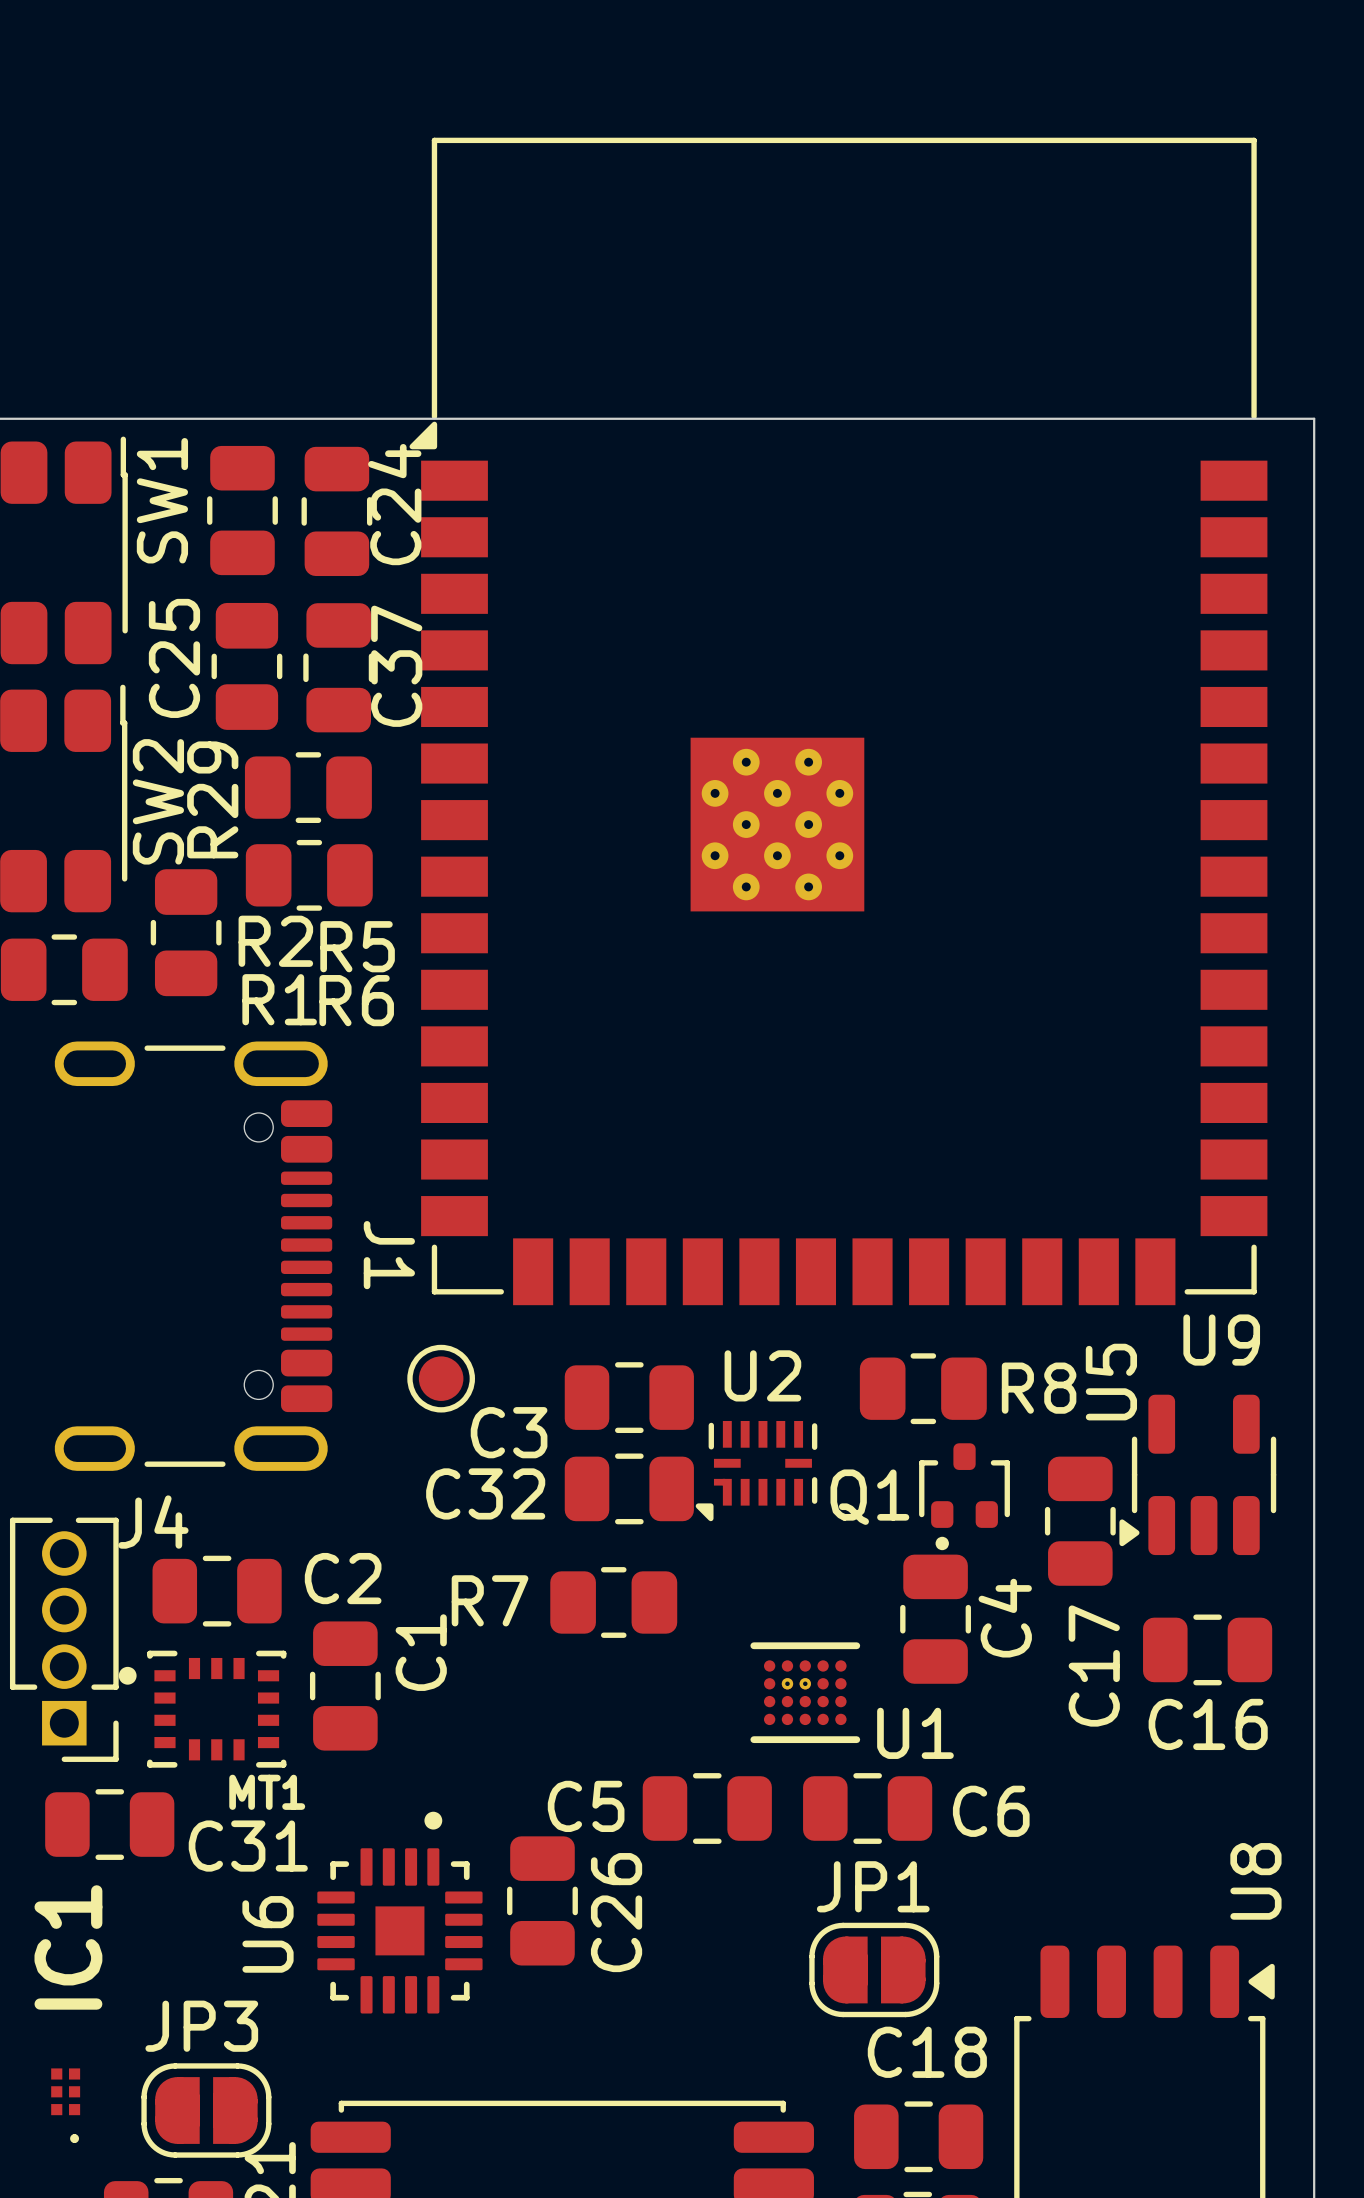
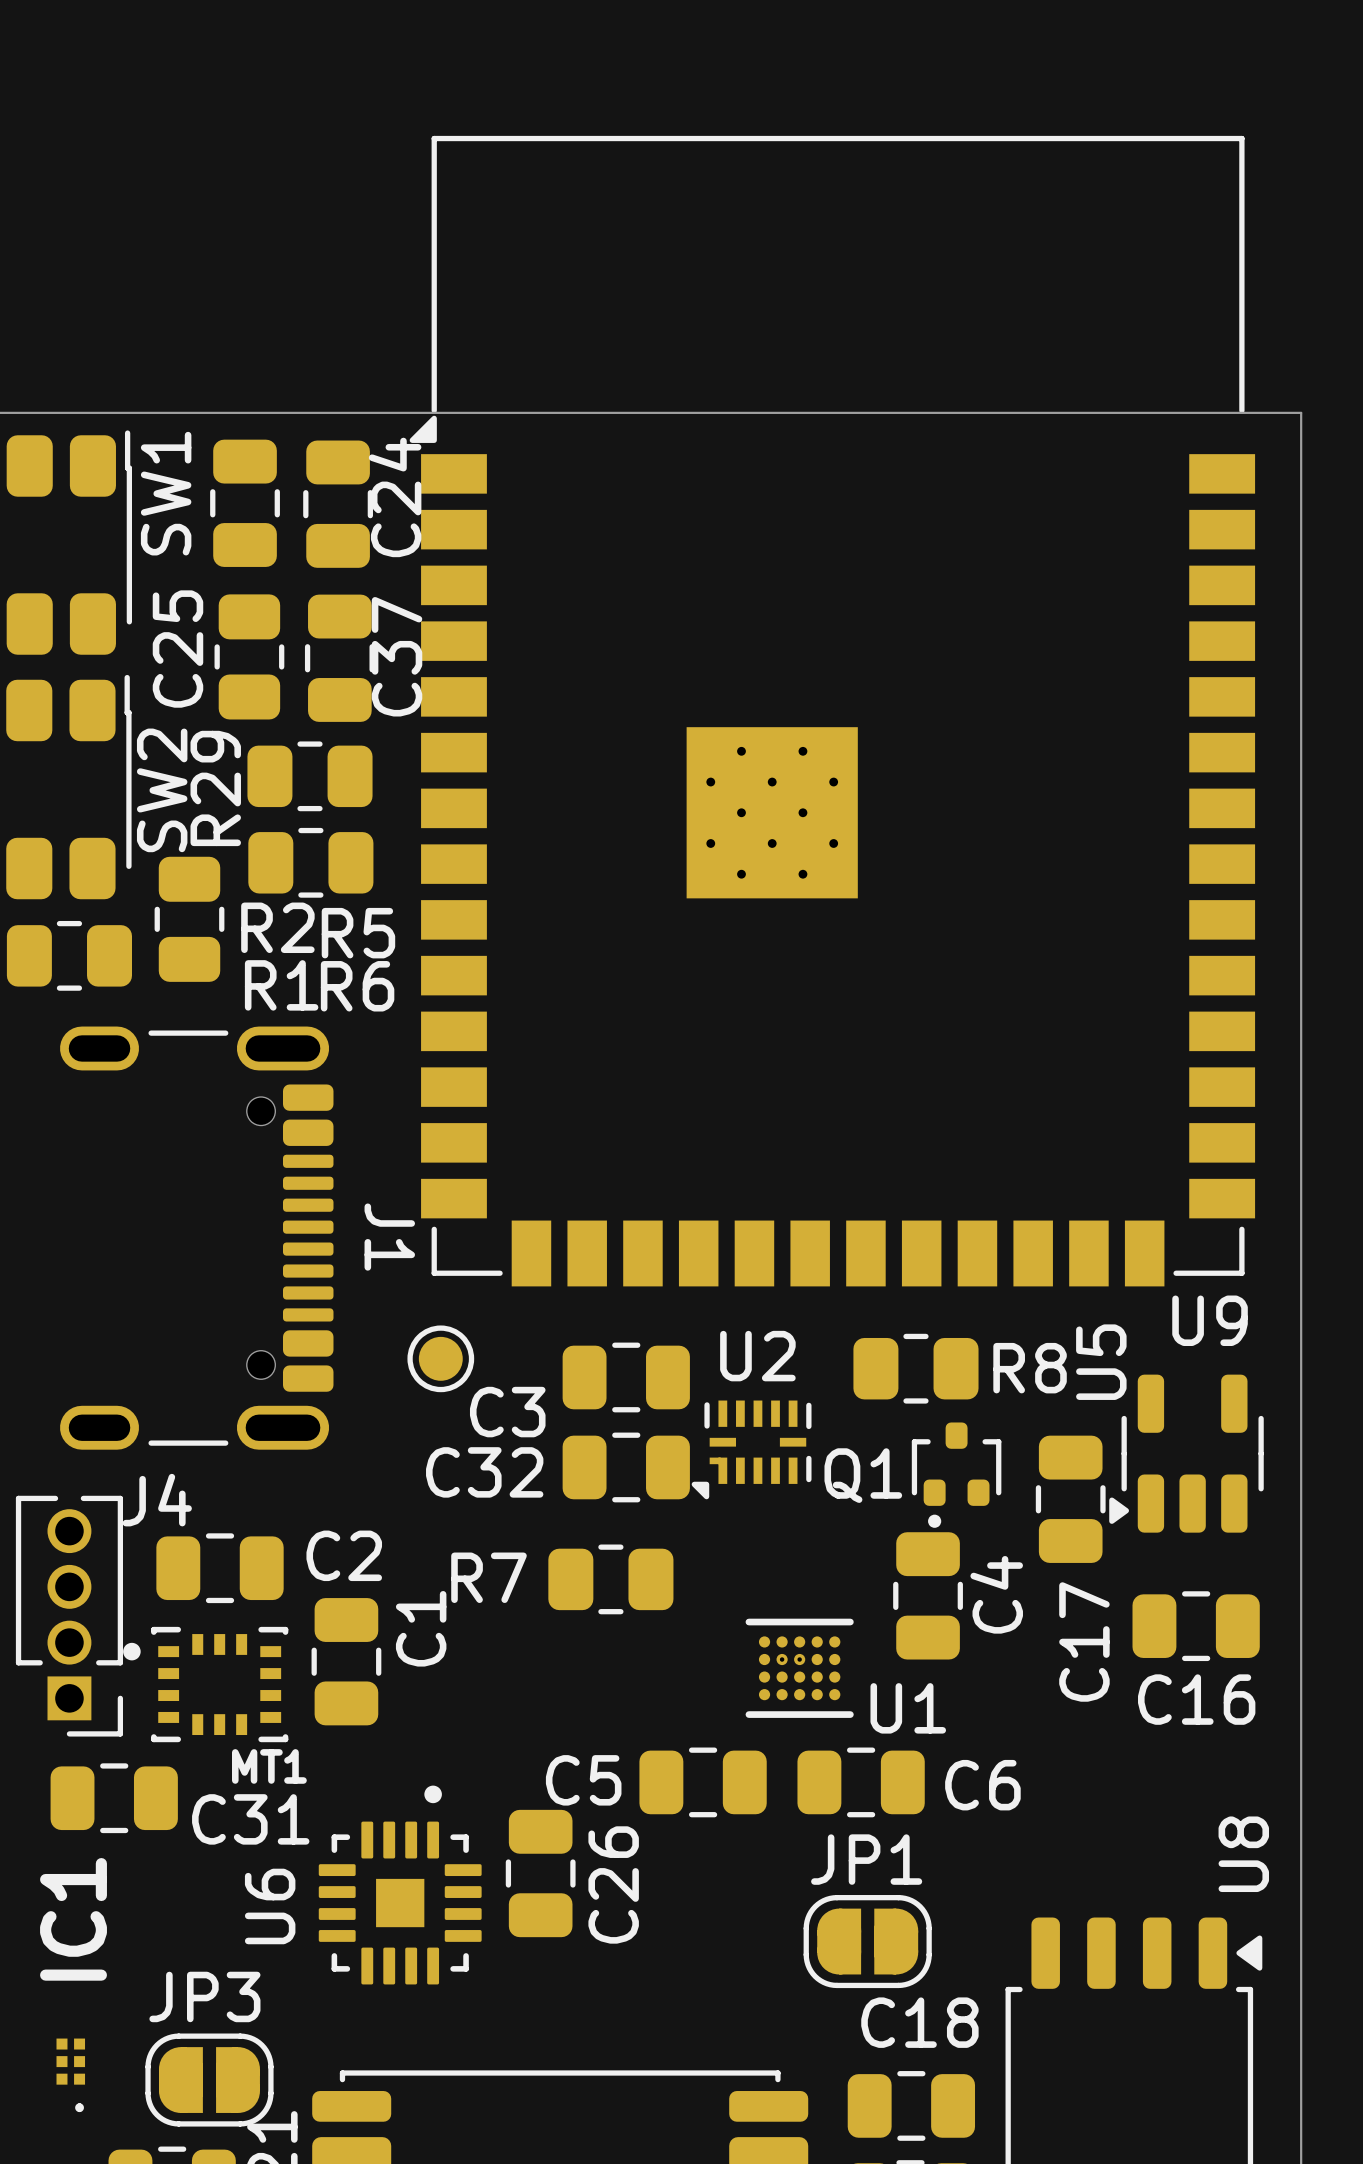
U1 footprint: [750, 1642, 861, 1744] -> [745, 1618, 854, 1718]

